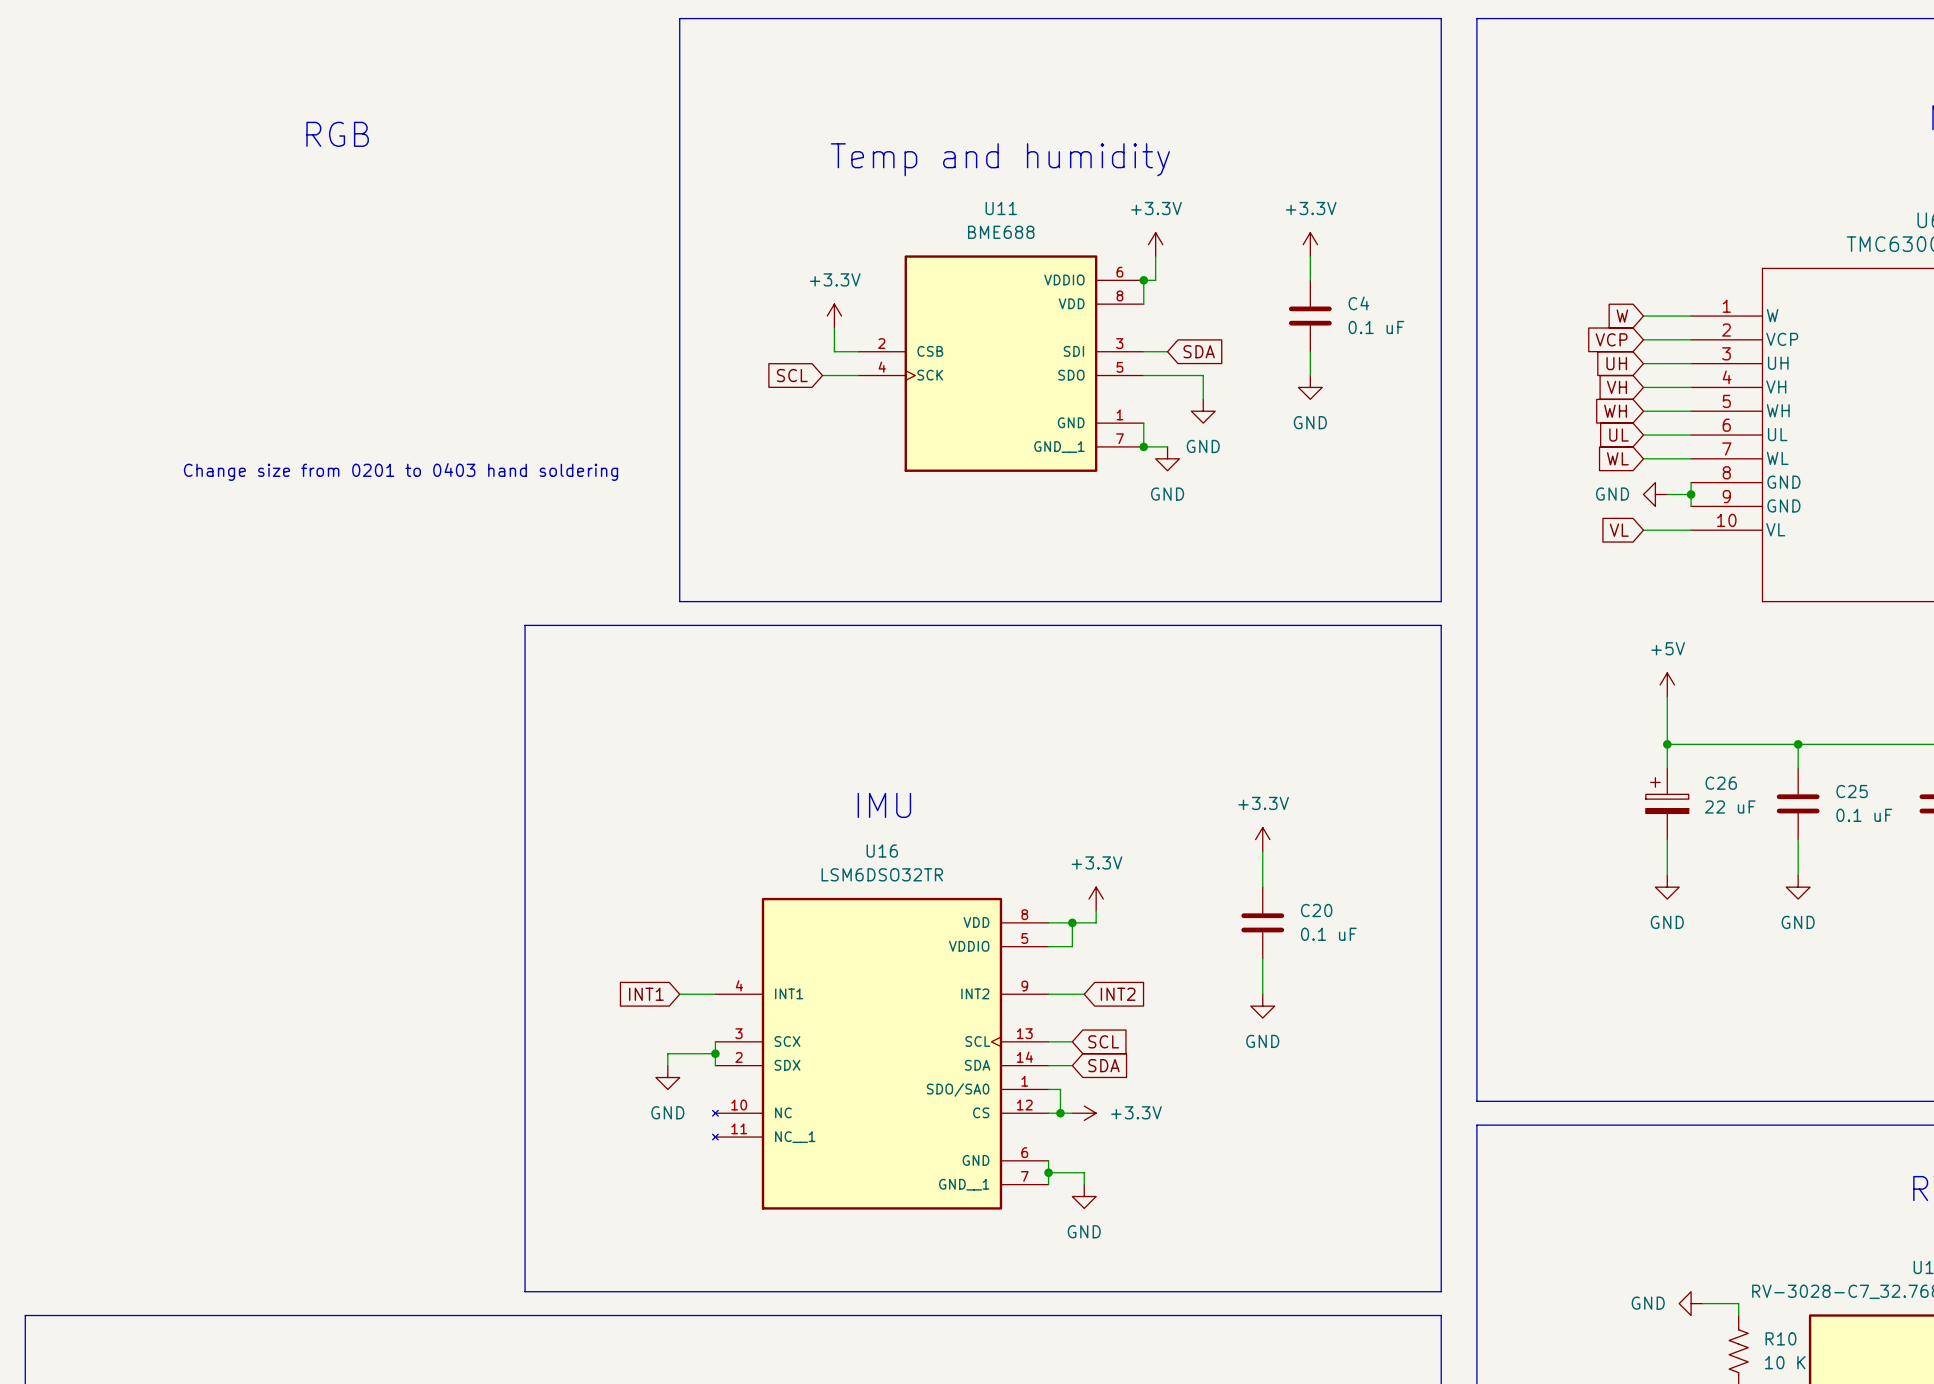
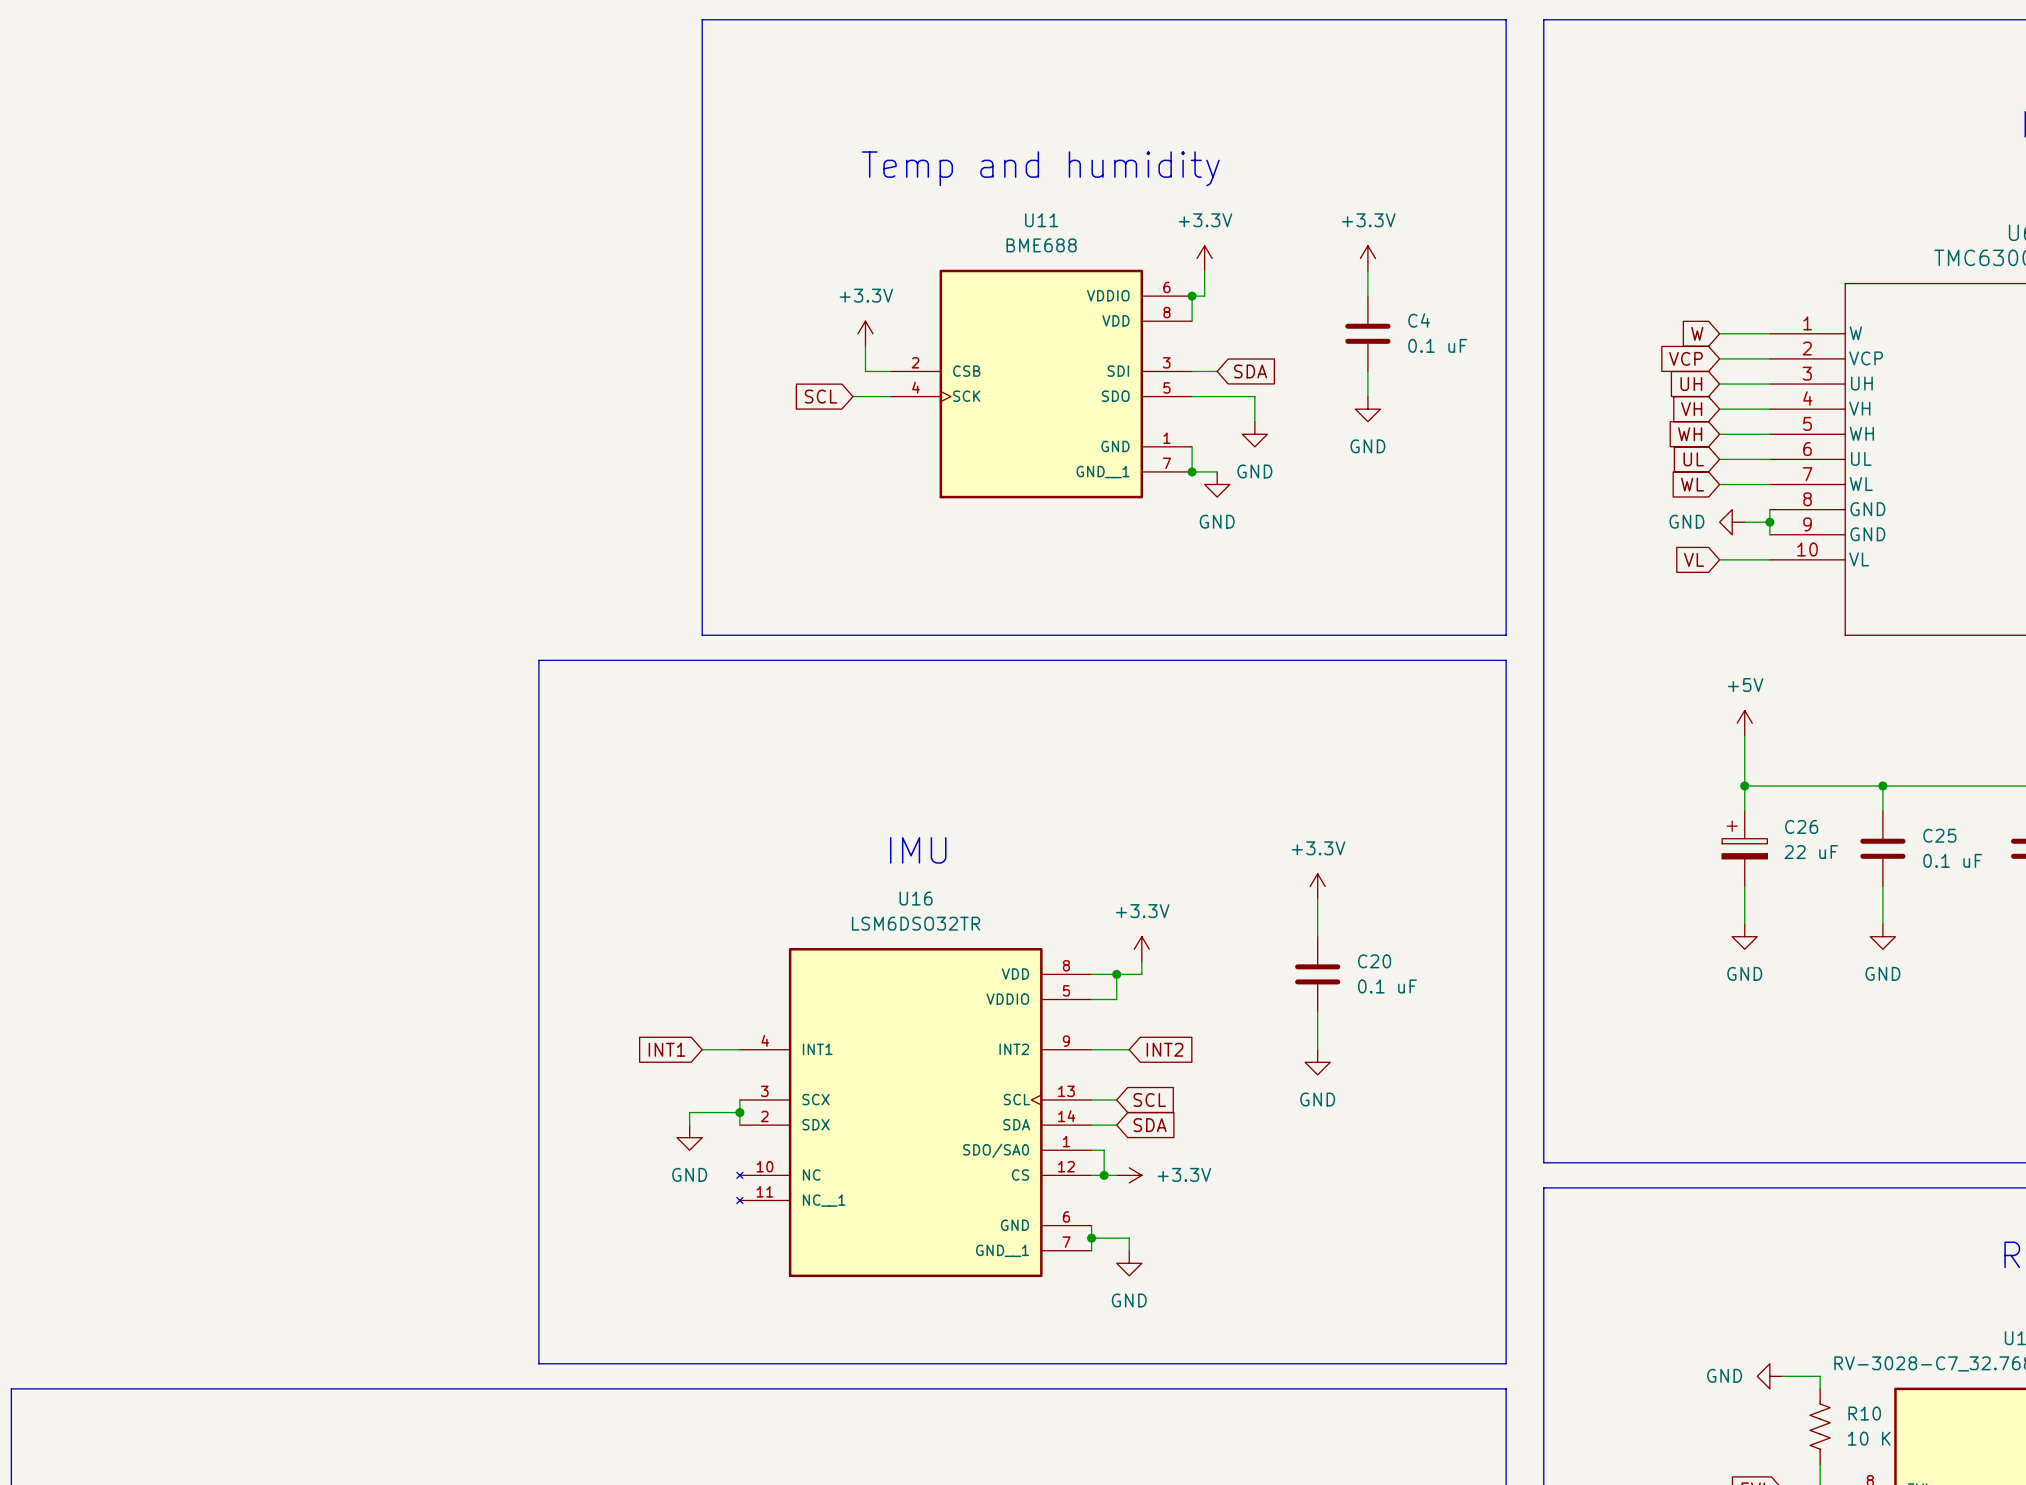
text: RGB (337, 134) -> none
text: Change size from 0201 to 0403 hand soldering (401, 472) -> none

